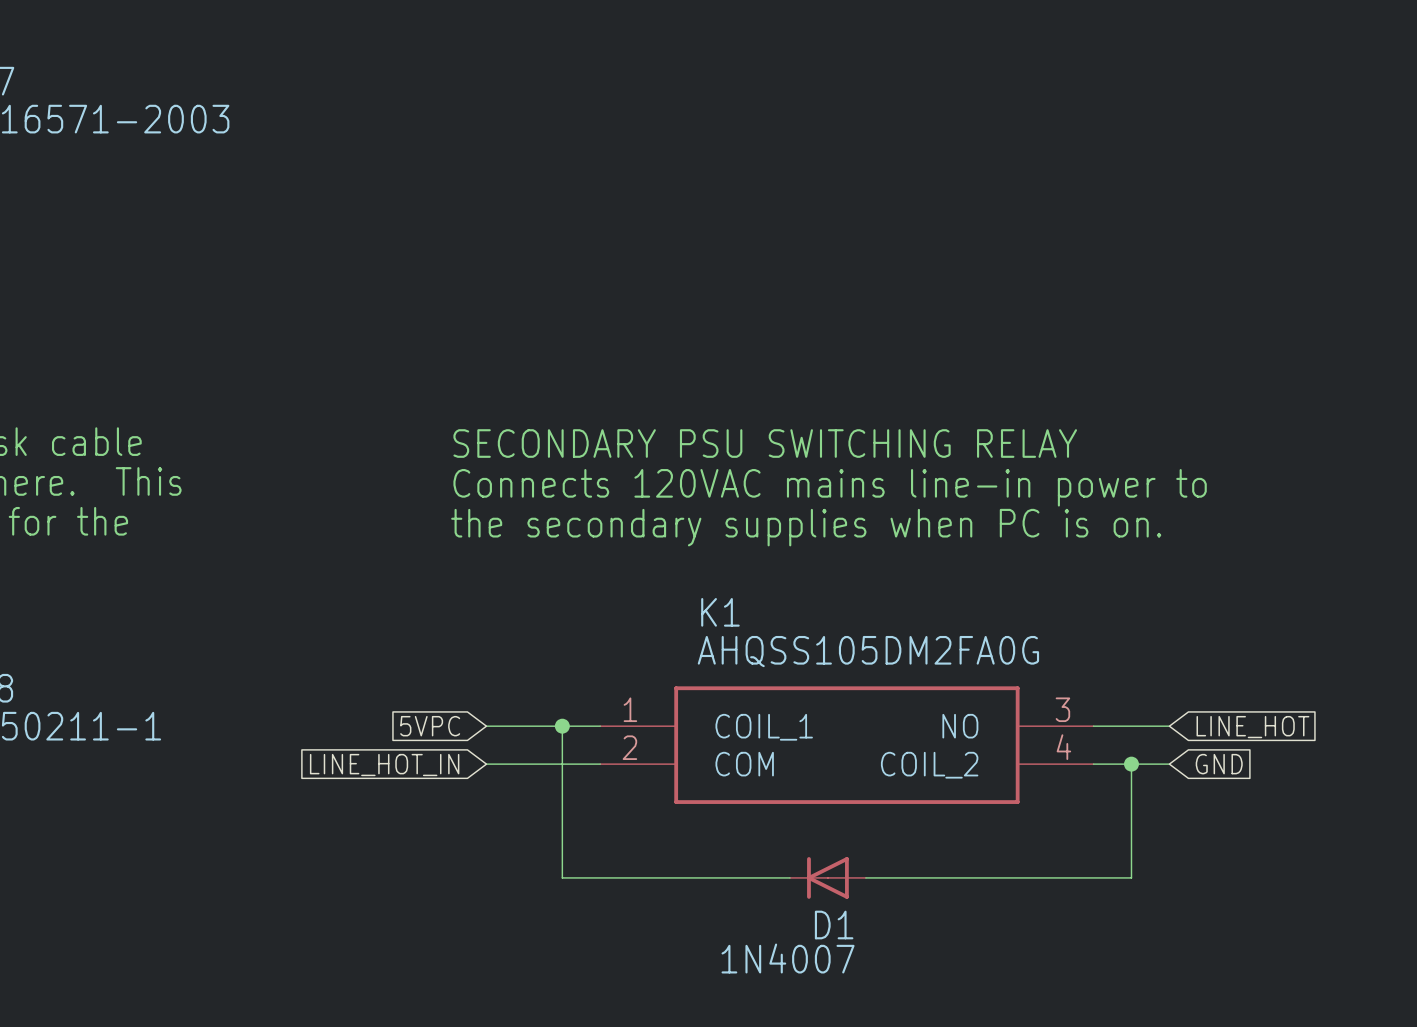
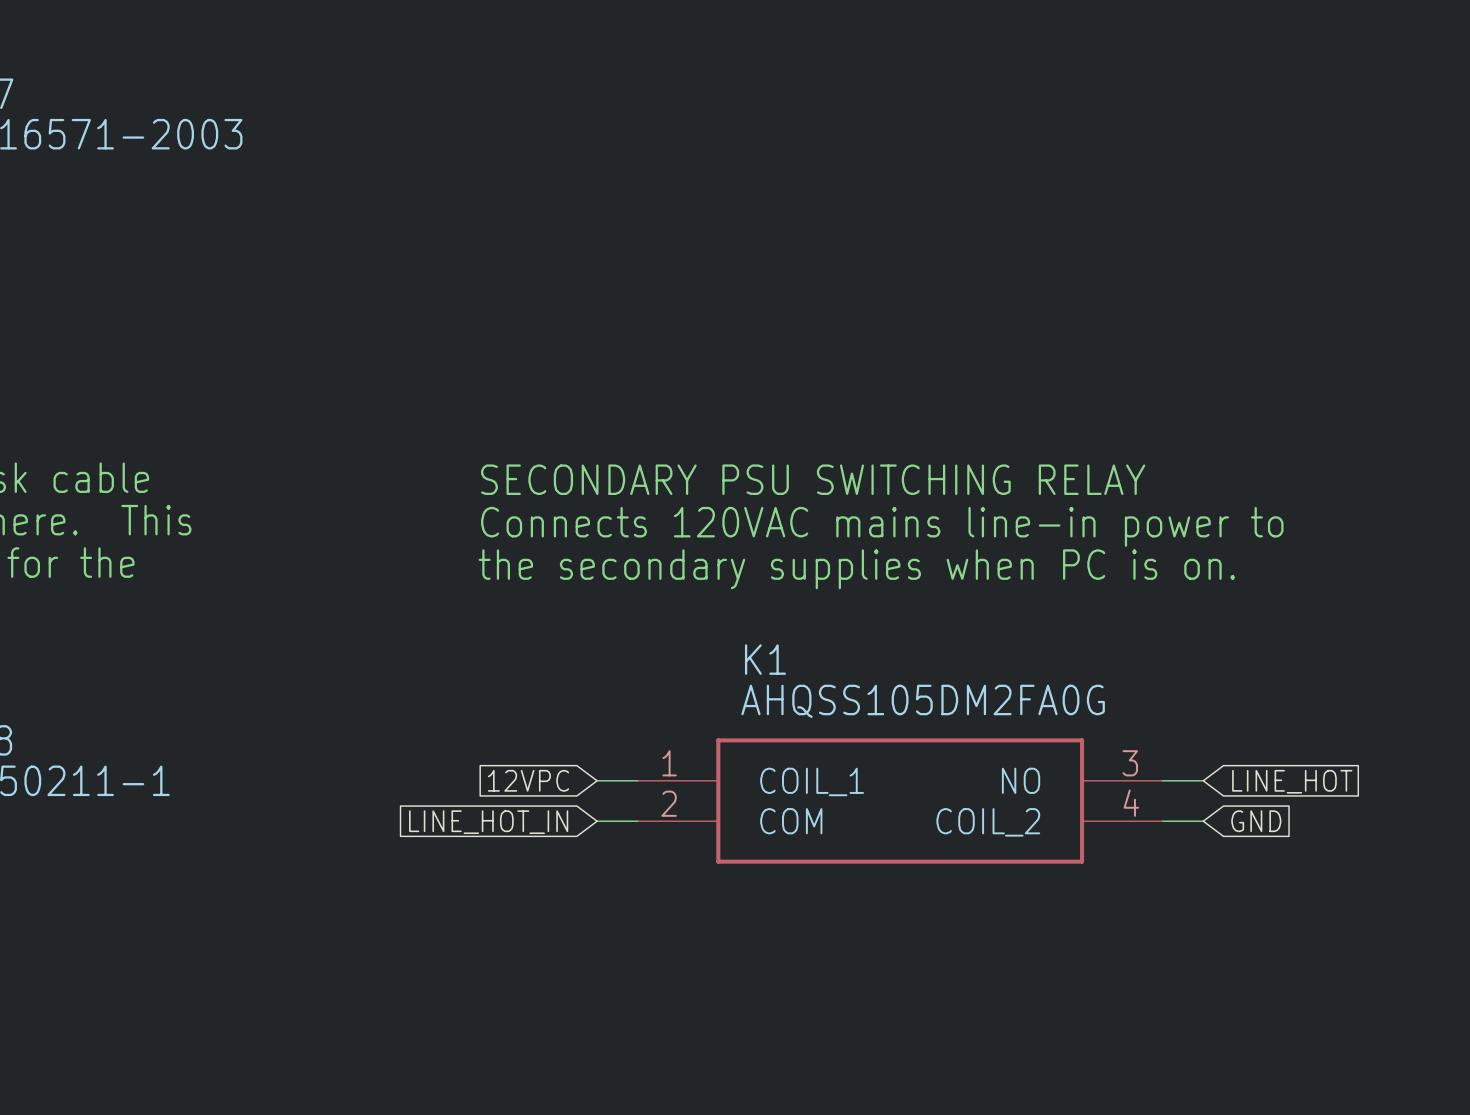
global label: 5VPC (430, 726) -> 12VPC (528, 780)
wire: (486, 726) (562, 726) (562, 877) (790, 877) -> none
junction: (562, 726) -> none
wire: (1131, 726) (1169, 726) -> none
global label position: LINE_HOT (1252, 727) -> LINE_HOT (1292, 781)
wire: (486, 764) (562, 764) -> none
junction: (1131, 764) -> none
wire: (1169, 764) (1131, 764) (1131, 877) (865, 877) -> none
global label position: GND (1219, 764) -> GND (1256, 821)
global label position: LINE_HOT_IN (384, 765) -> LINE_HOT_IN (488, 822)
D1: 1N4007 (827, 877) -> none

